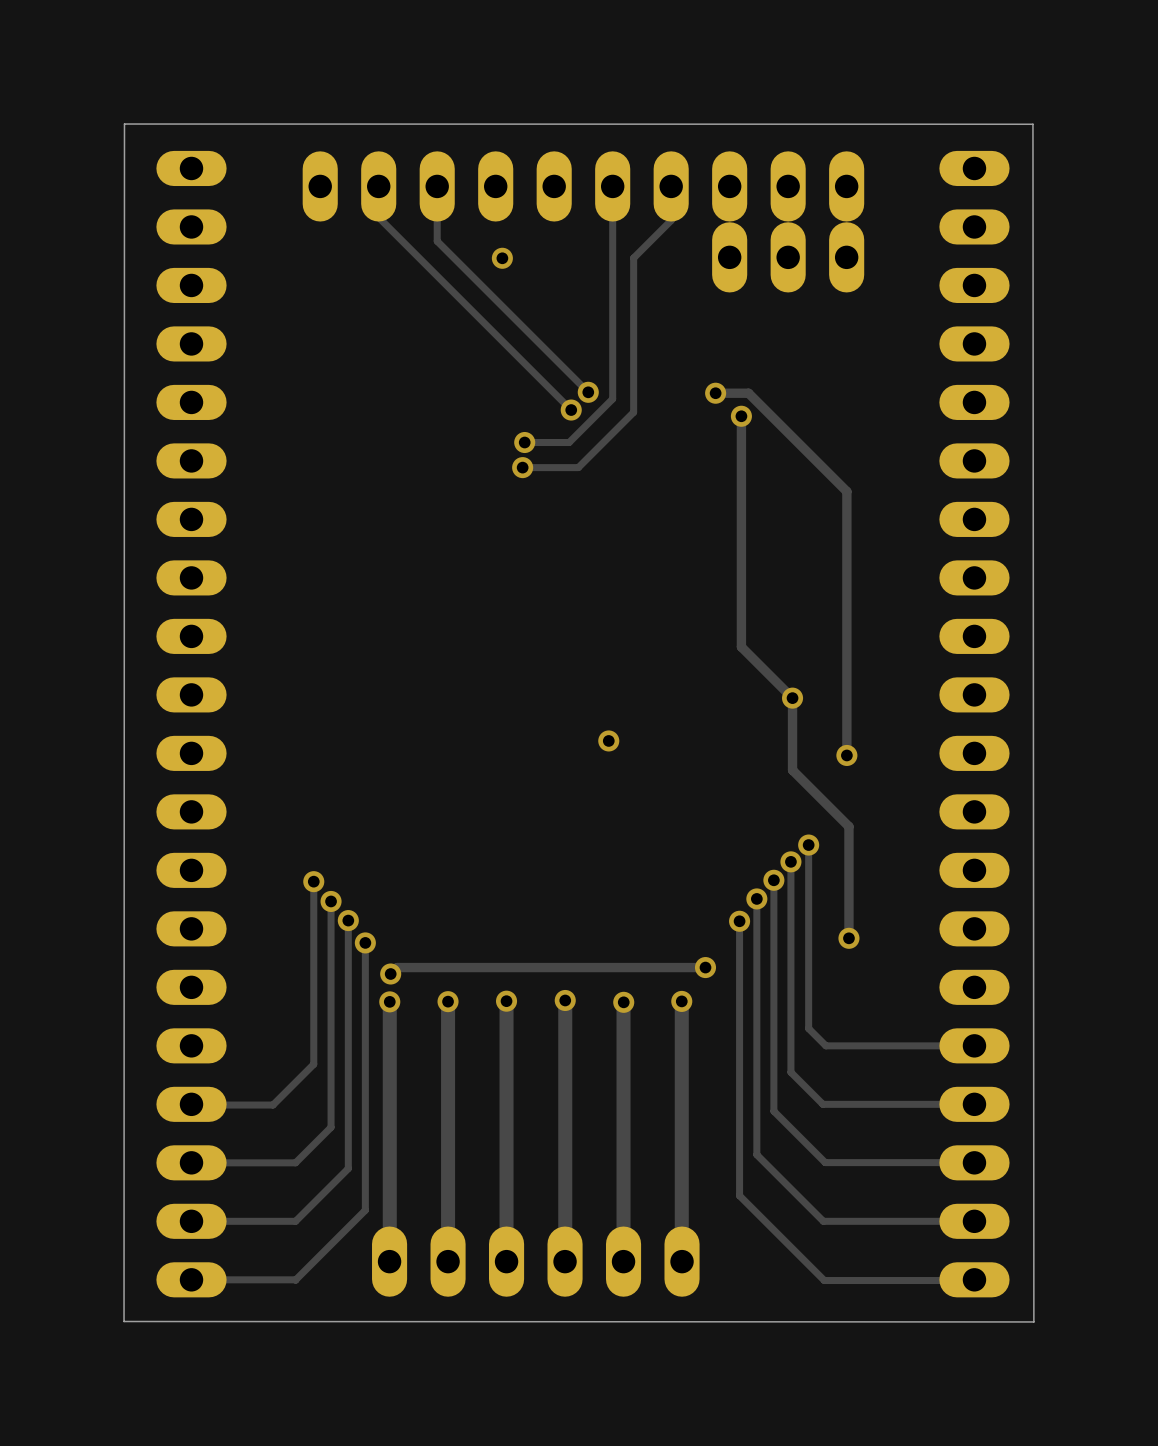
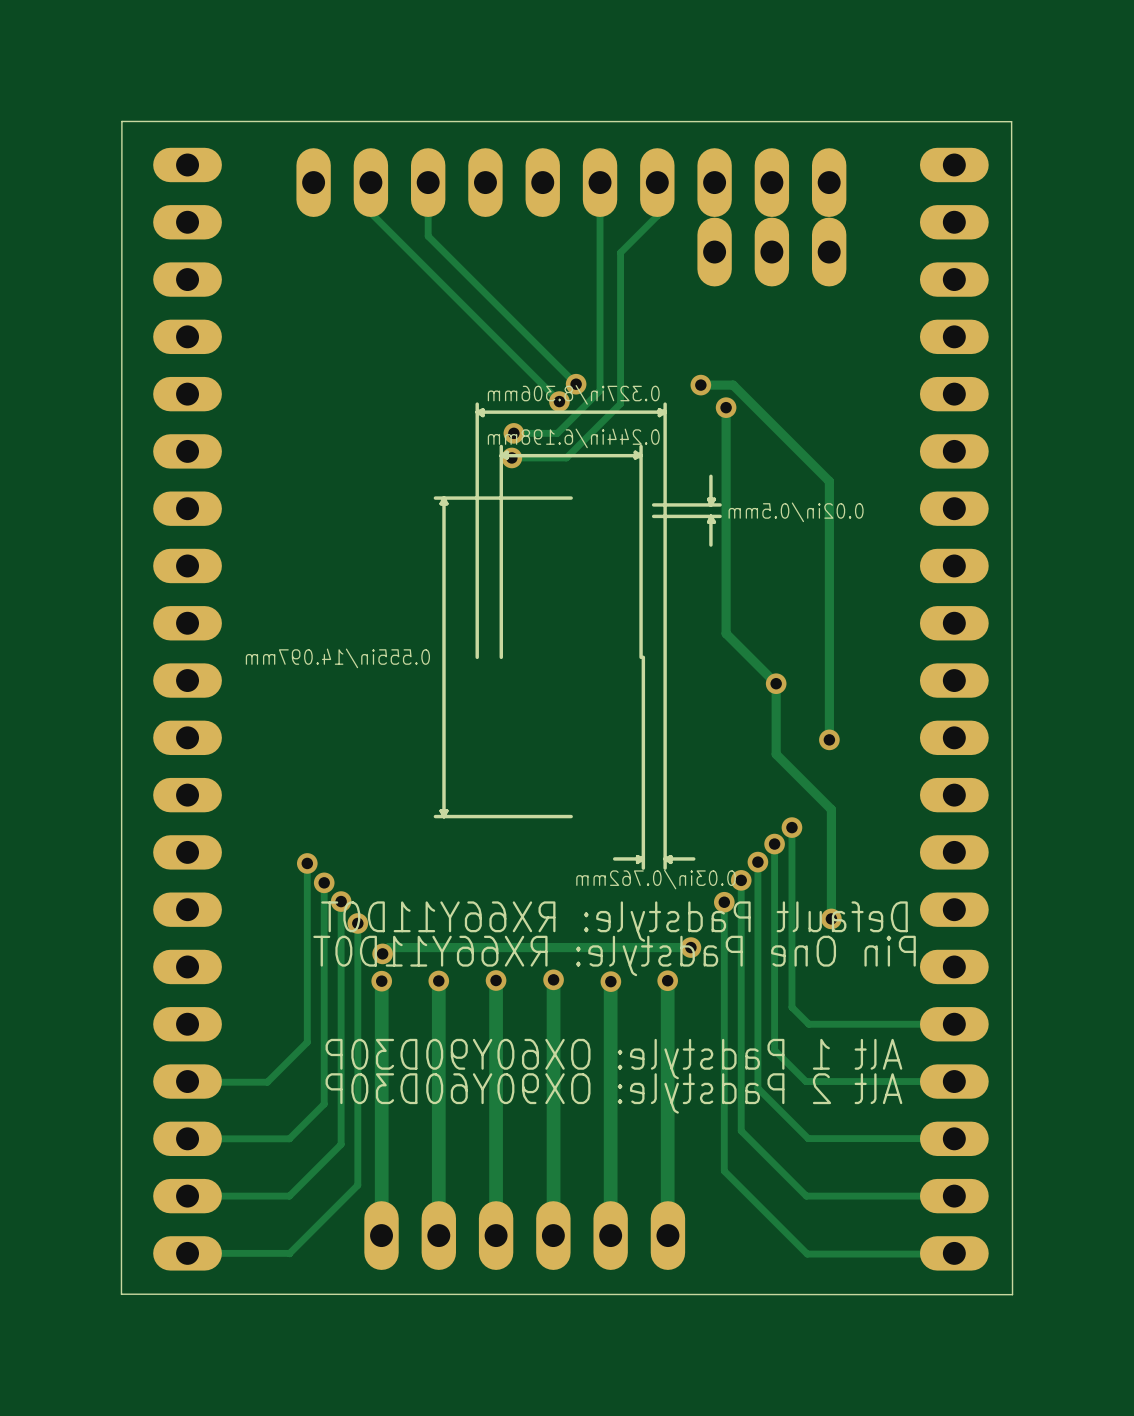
via: (502, 258) -> none
part: none -> (577, 636)
via: (608, 740) -> none

